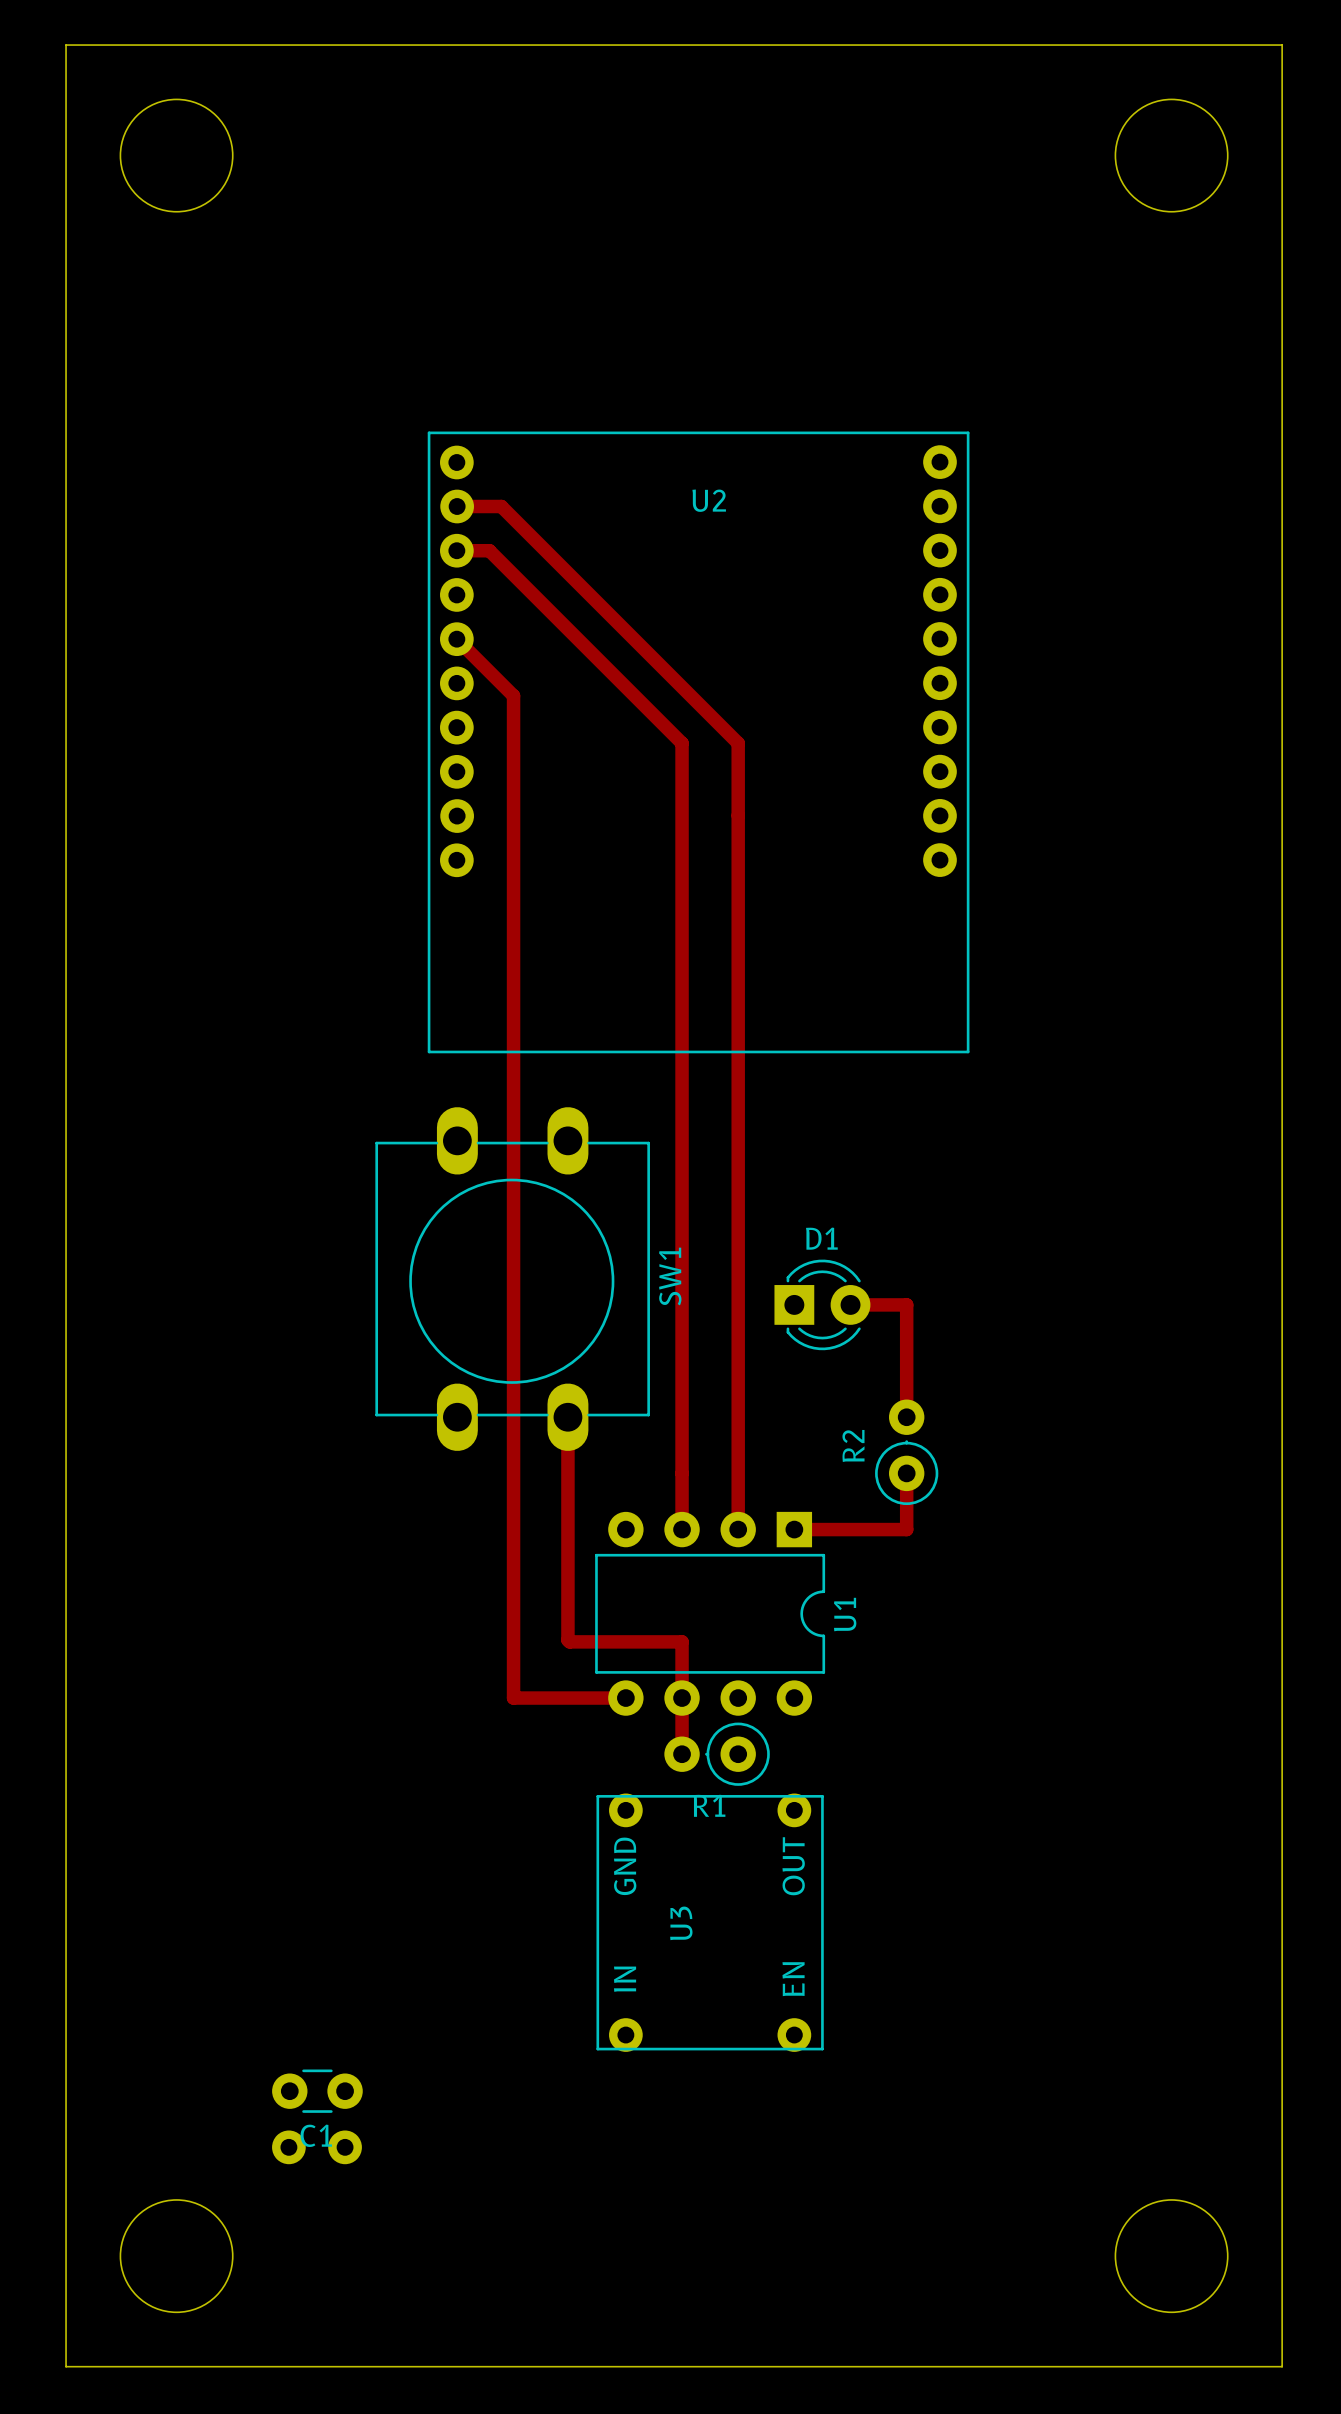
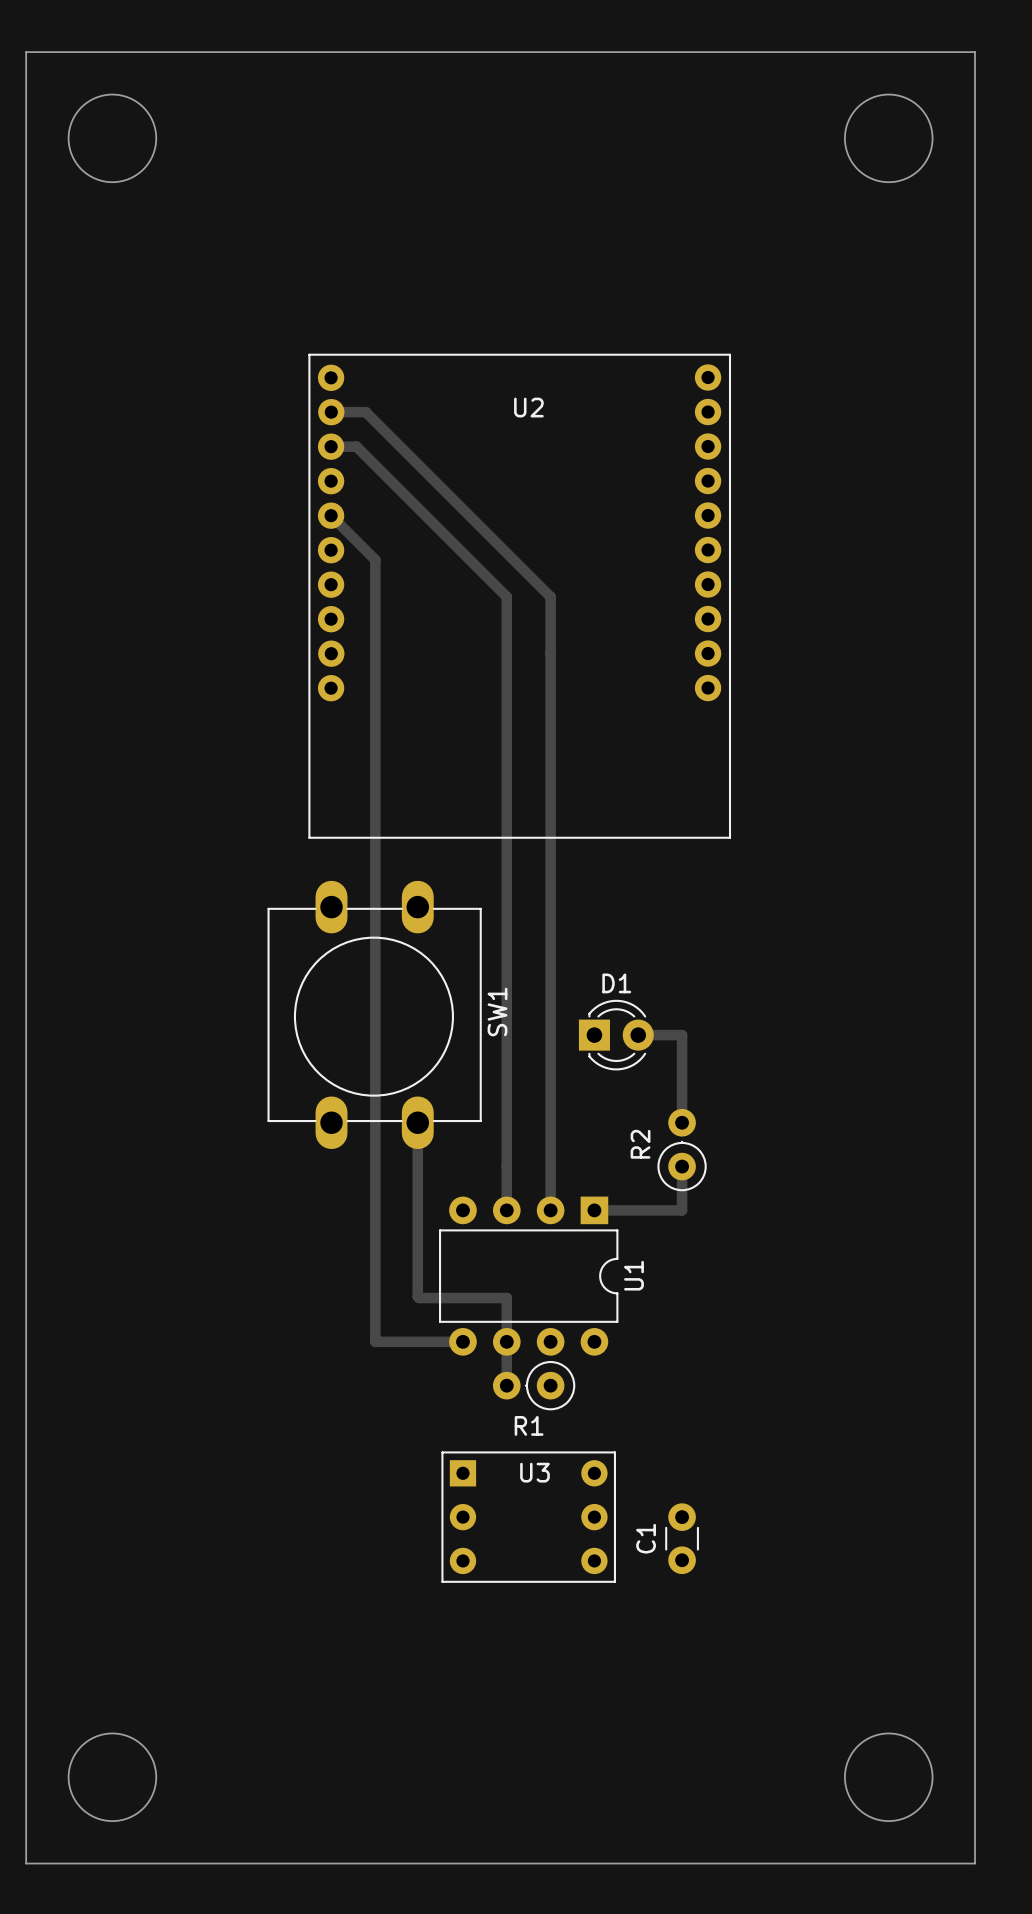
U3 footprint: [596, 1793, 824, 2052] -> [441, 1451, 617, 1583]
U3 name position: U3 (681, 1923) -> U3 (534, 1472)
C1 rotation: 0° (317, 2091) -> 90° clockwise (682, 1538)
C1 position: (317, 2091) -> (682, 1538)
part: (316, 2147) -> none

